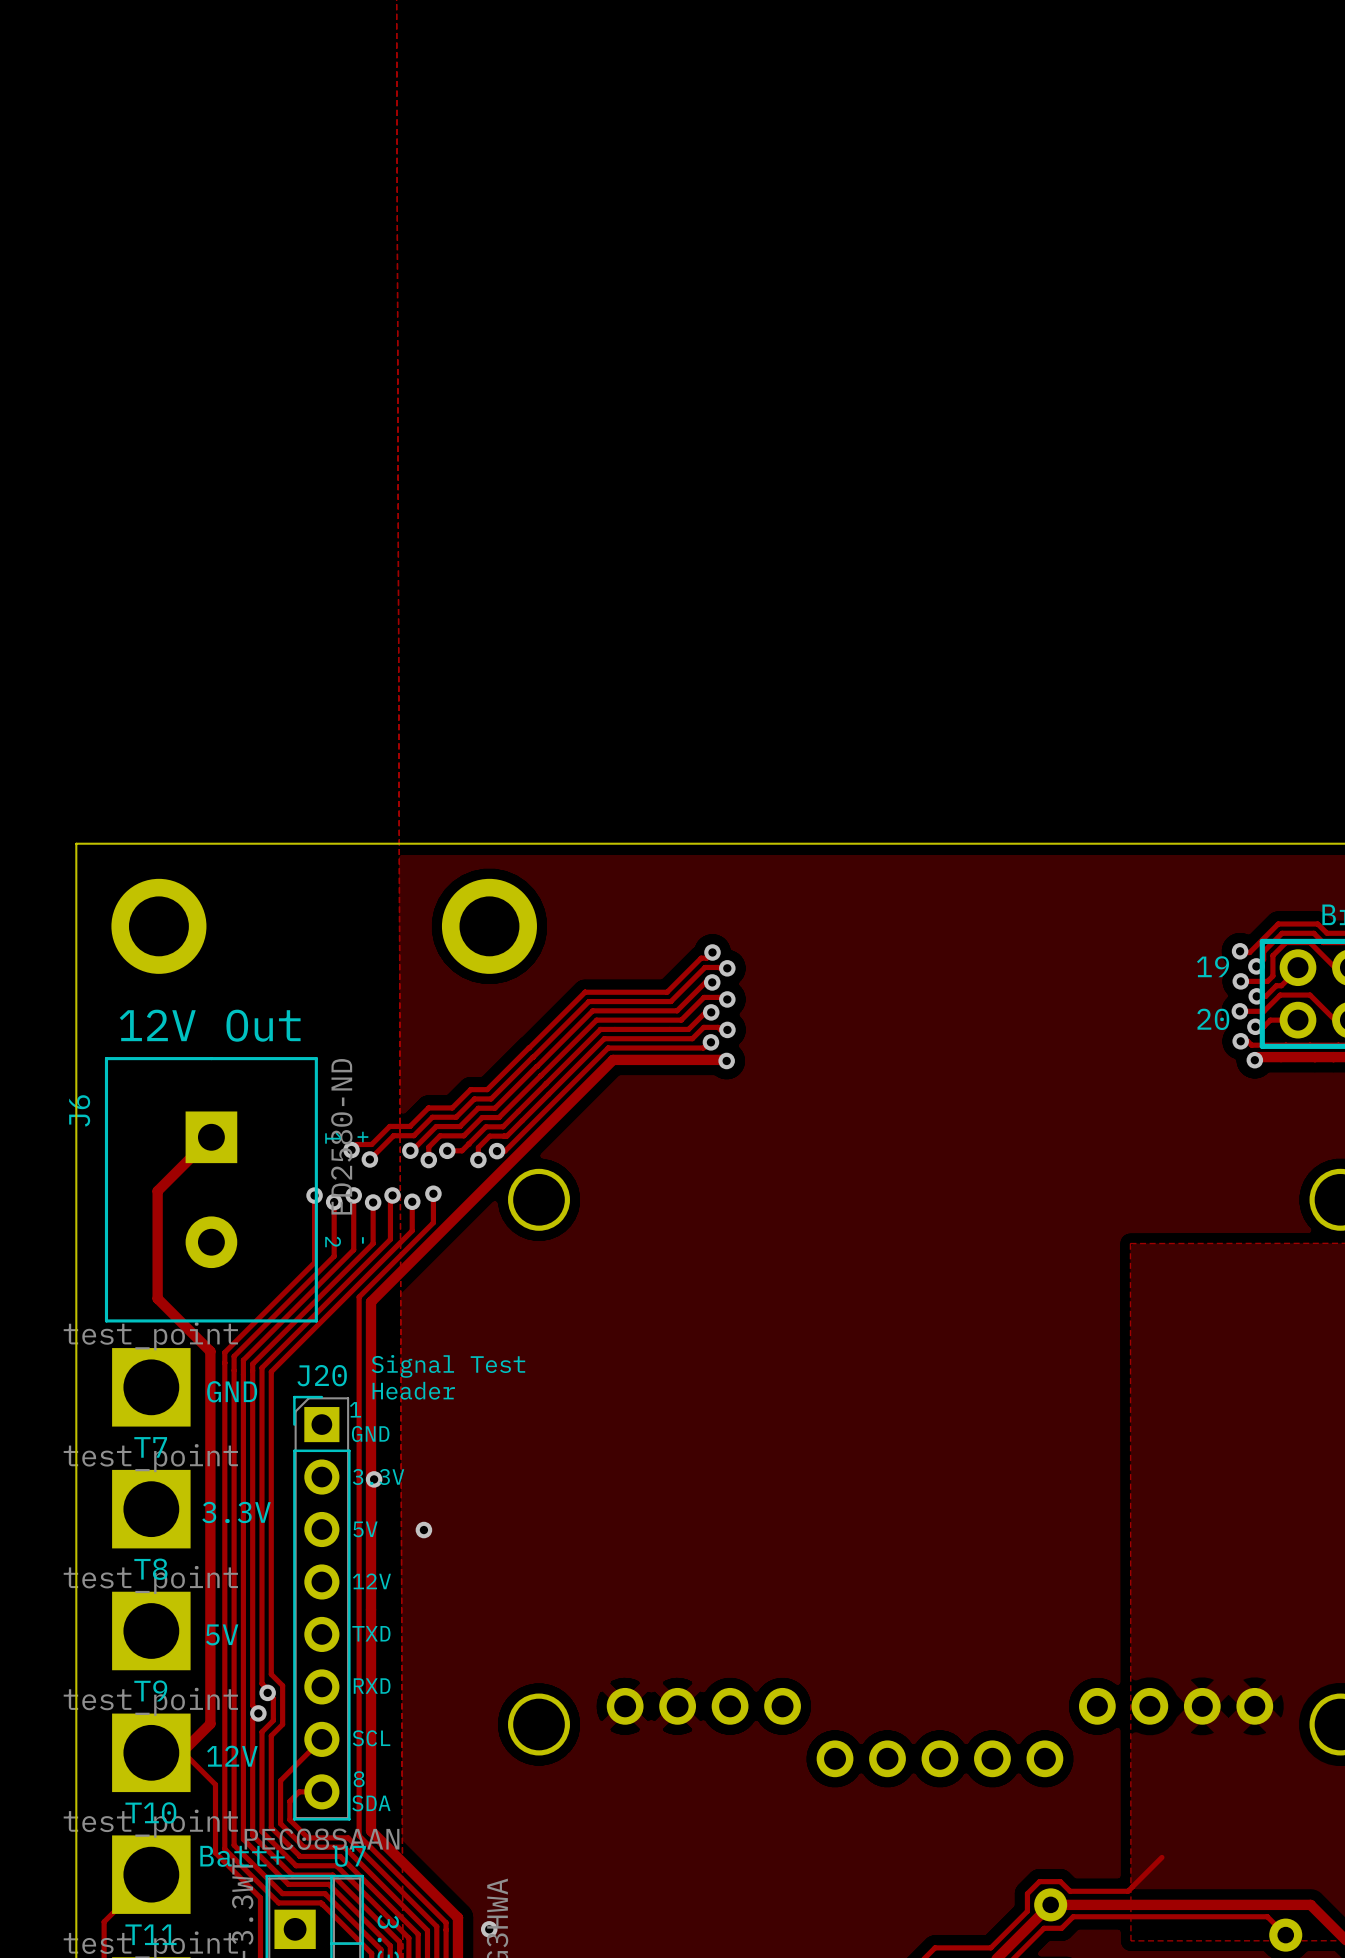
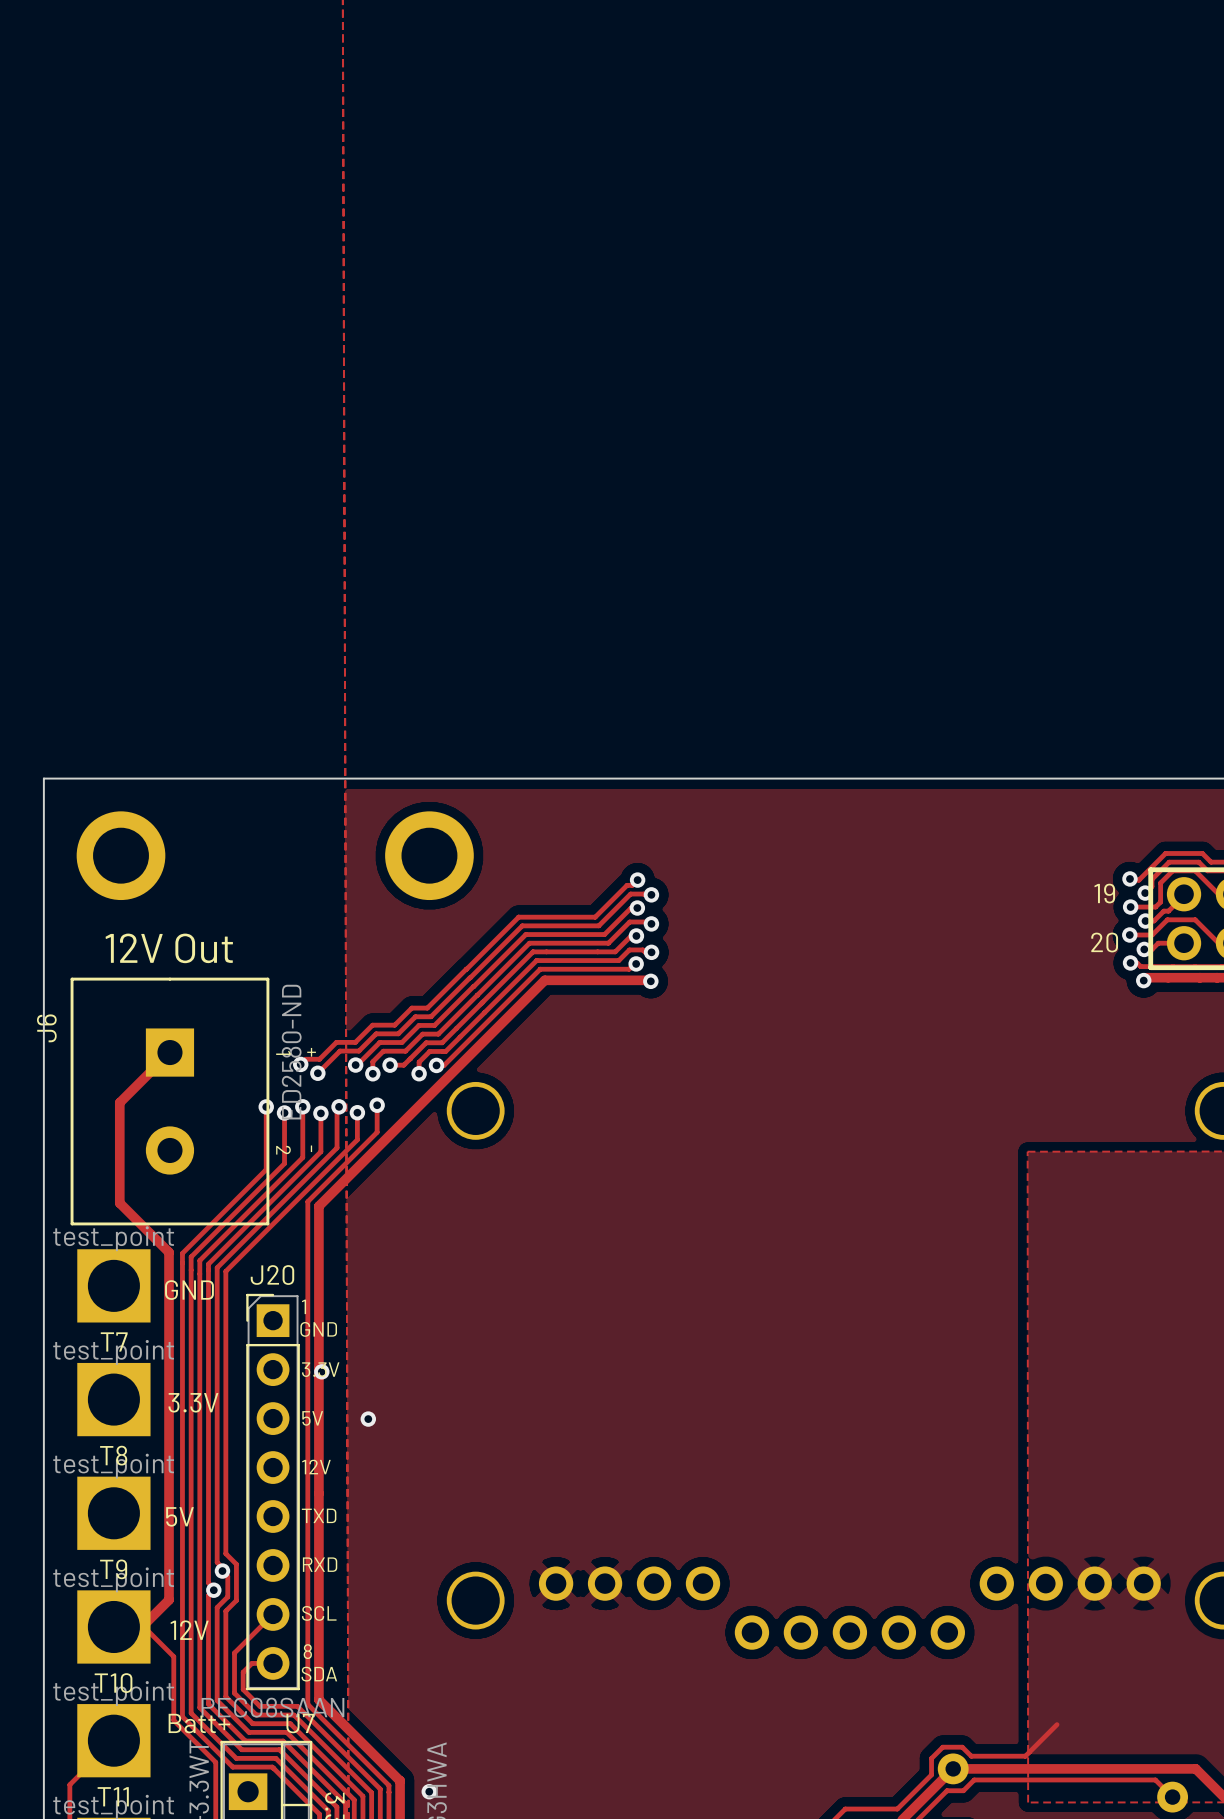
text: Signal Test (448, 1366) -> none
text: Header (413, 1390) -> none

